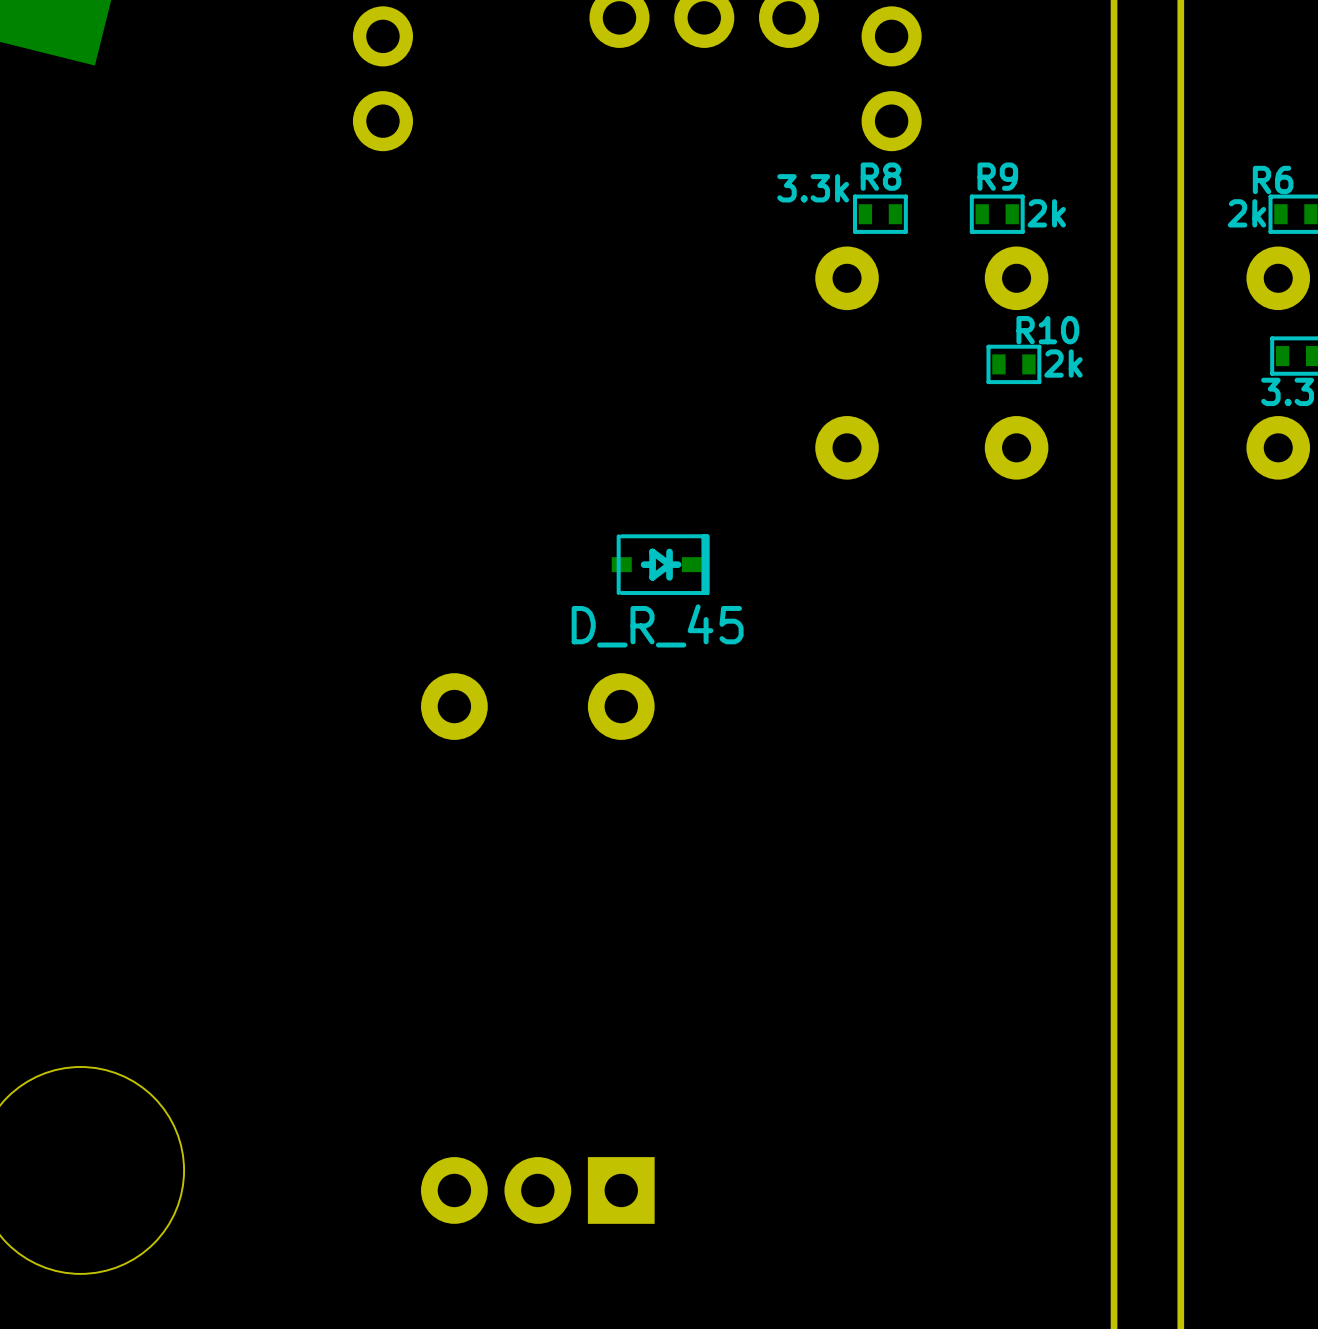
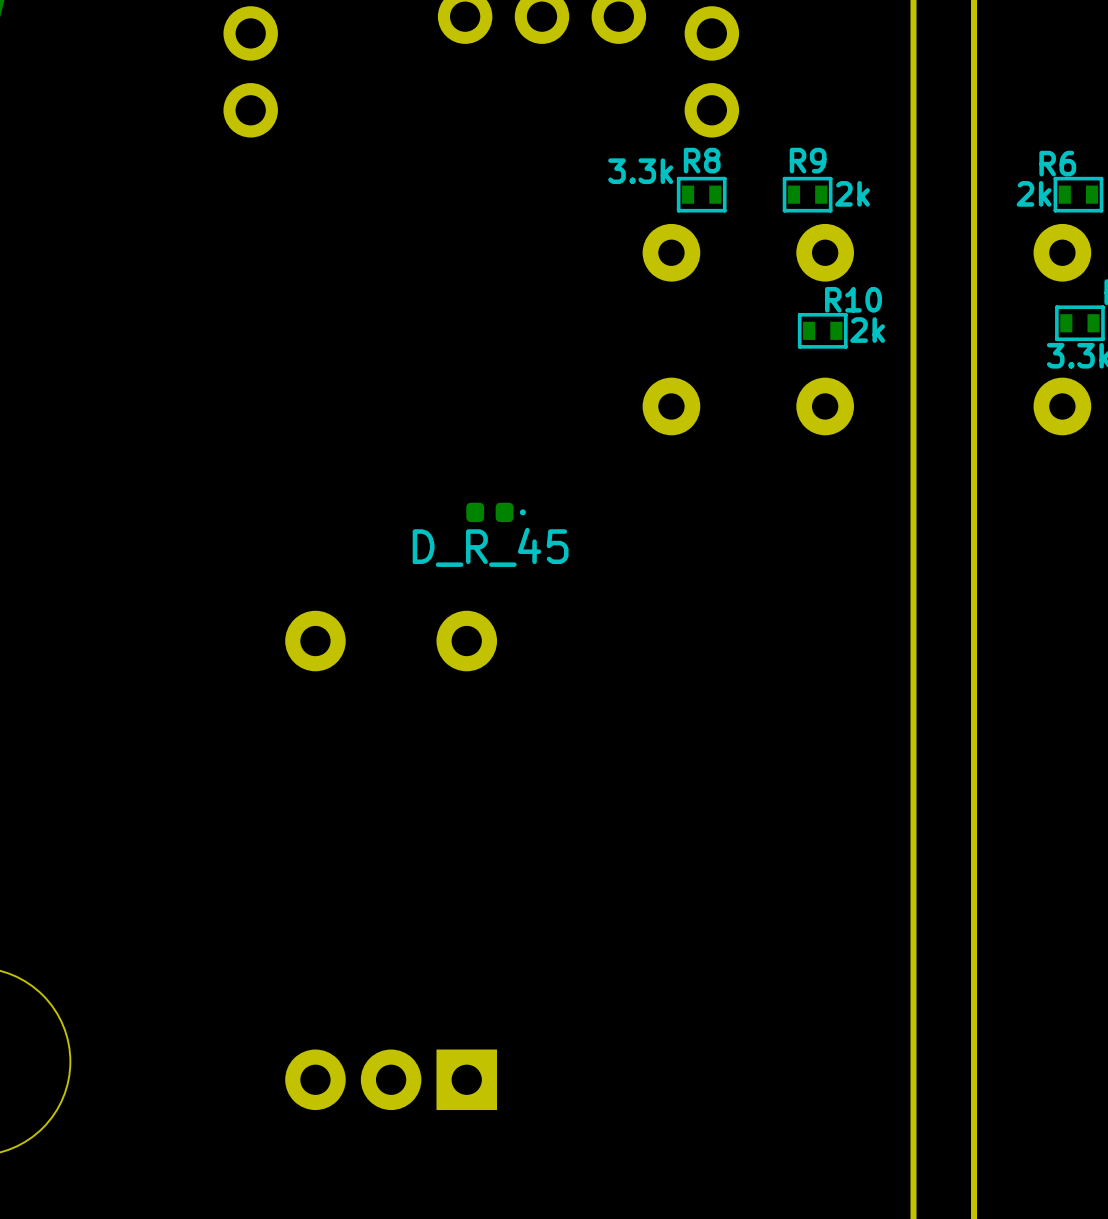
D_R_45 footprint: [611, 534, 710, 596] -> [466, 502, 526, 523]

